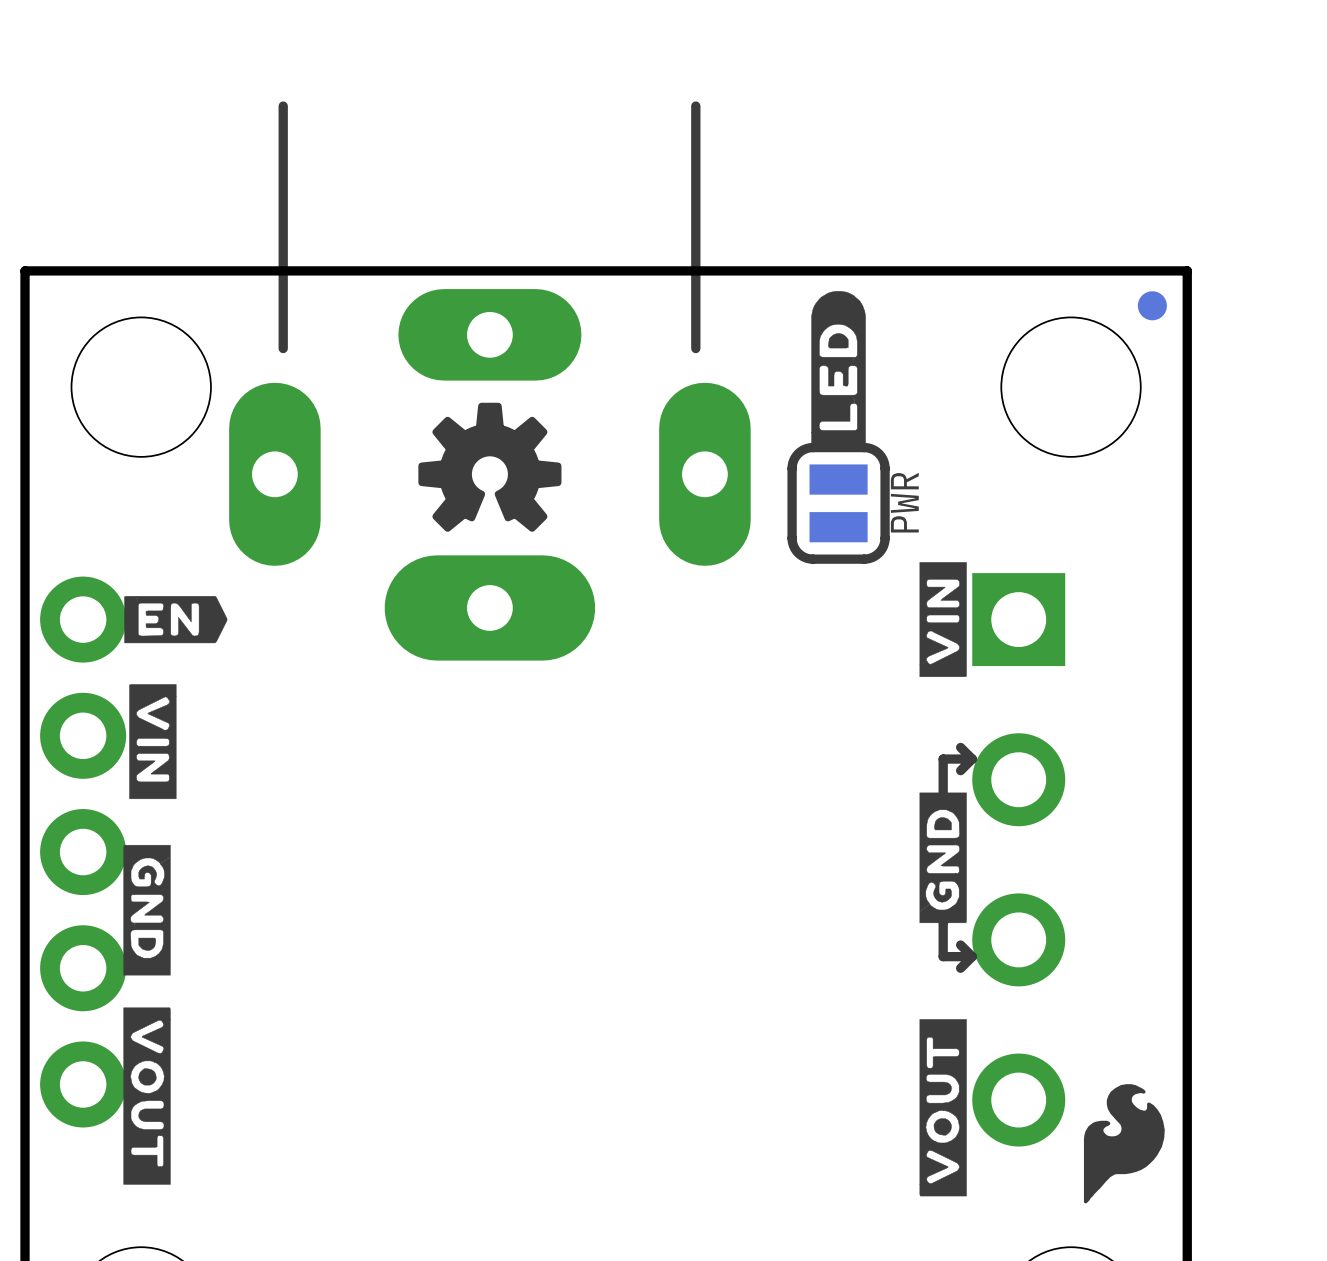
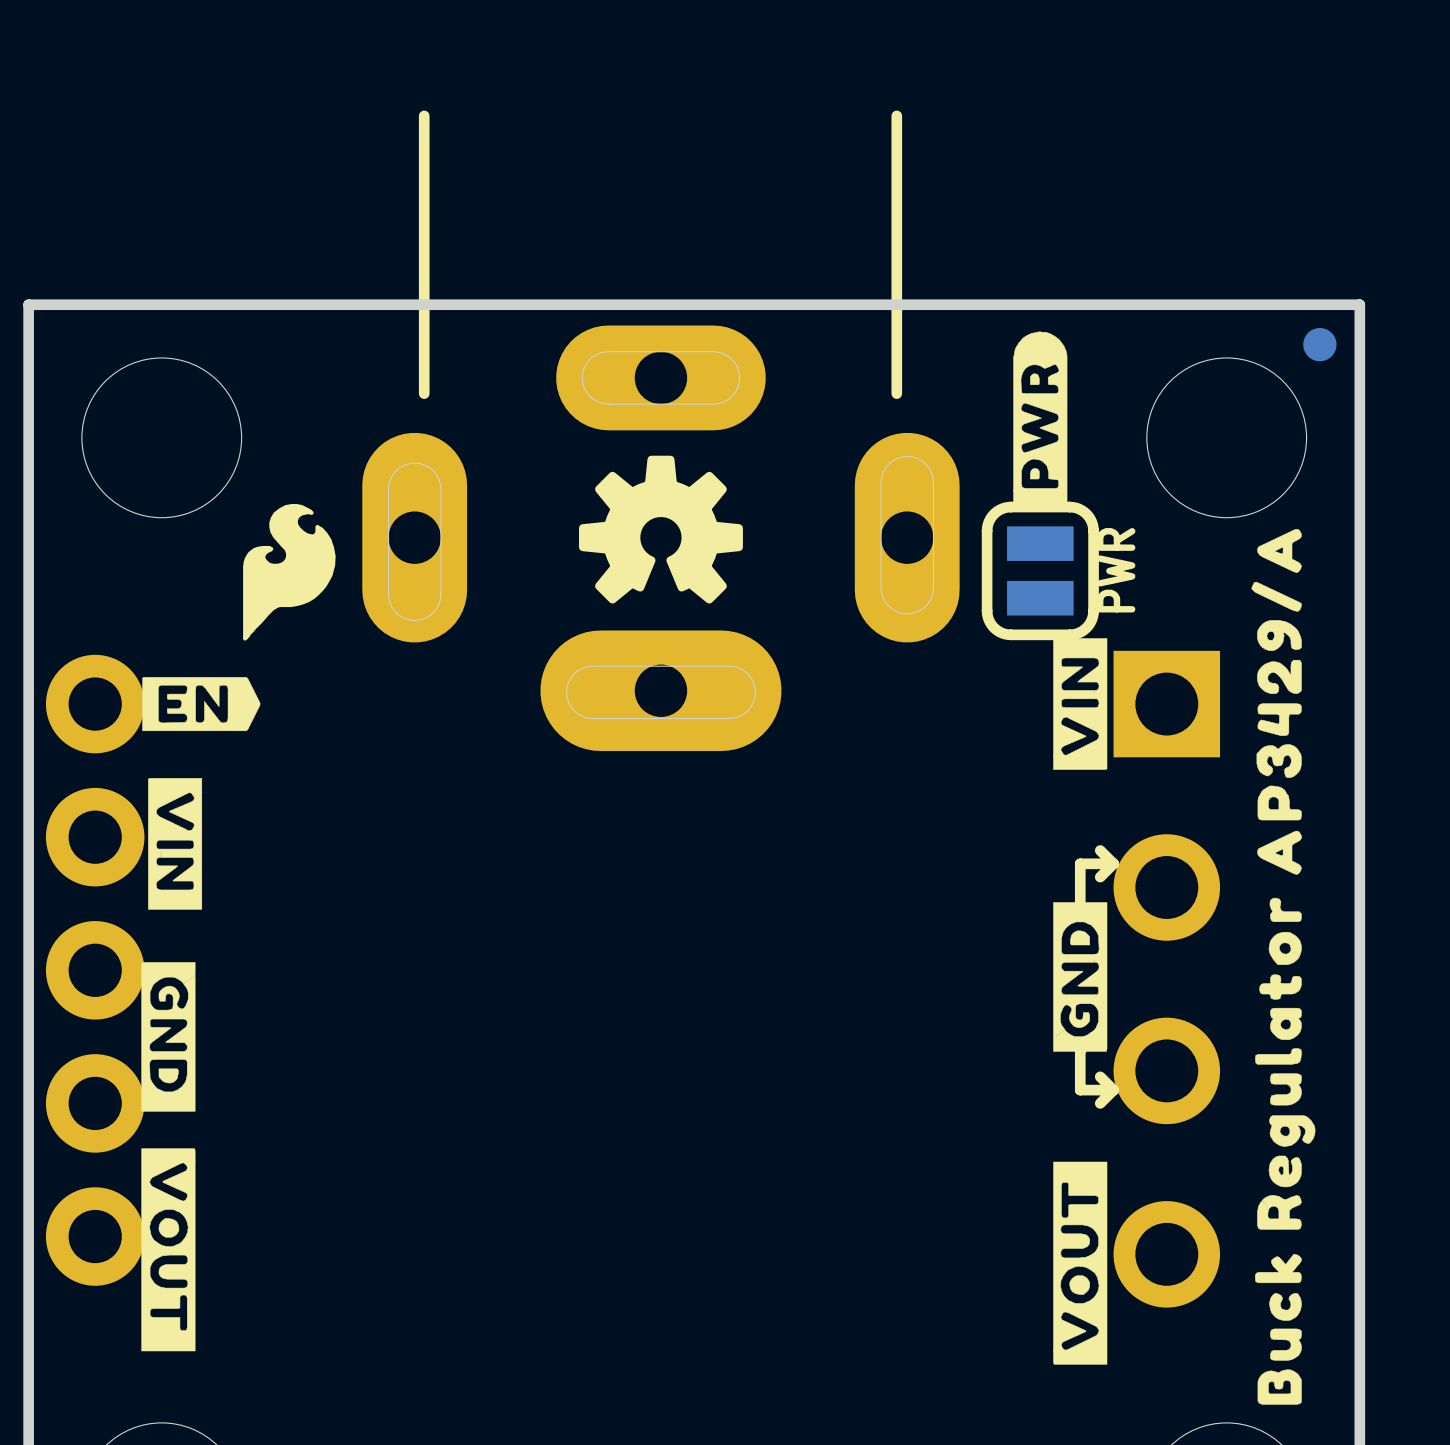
drawing: [811, 291, 866, 447] -> none
drawing: none -> [1013, 331, 1068, 504]
part: (489, 380) -> none
part: none -> (660, 430)
drawing: none -> [1251, 528, 1316, 1405]
drawing position: (489, 467) -> (660, 529)
PWR position: (838, 503) -> (1040, 570)
drawing position: (1124, 1143) -> (289, 572)

